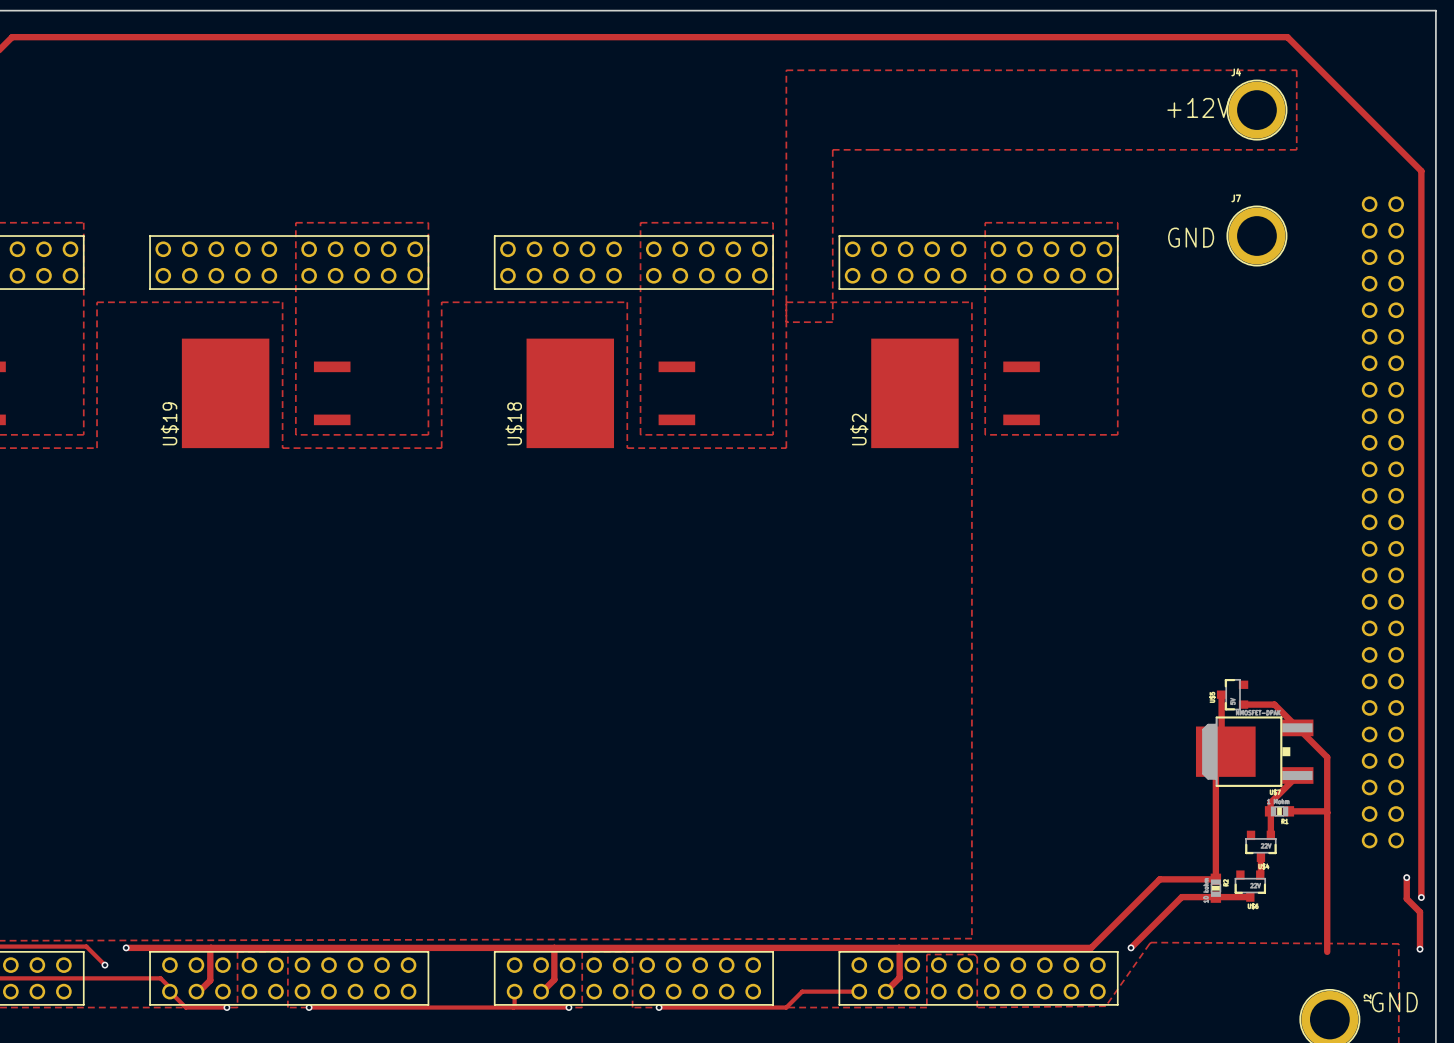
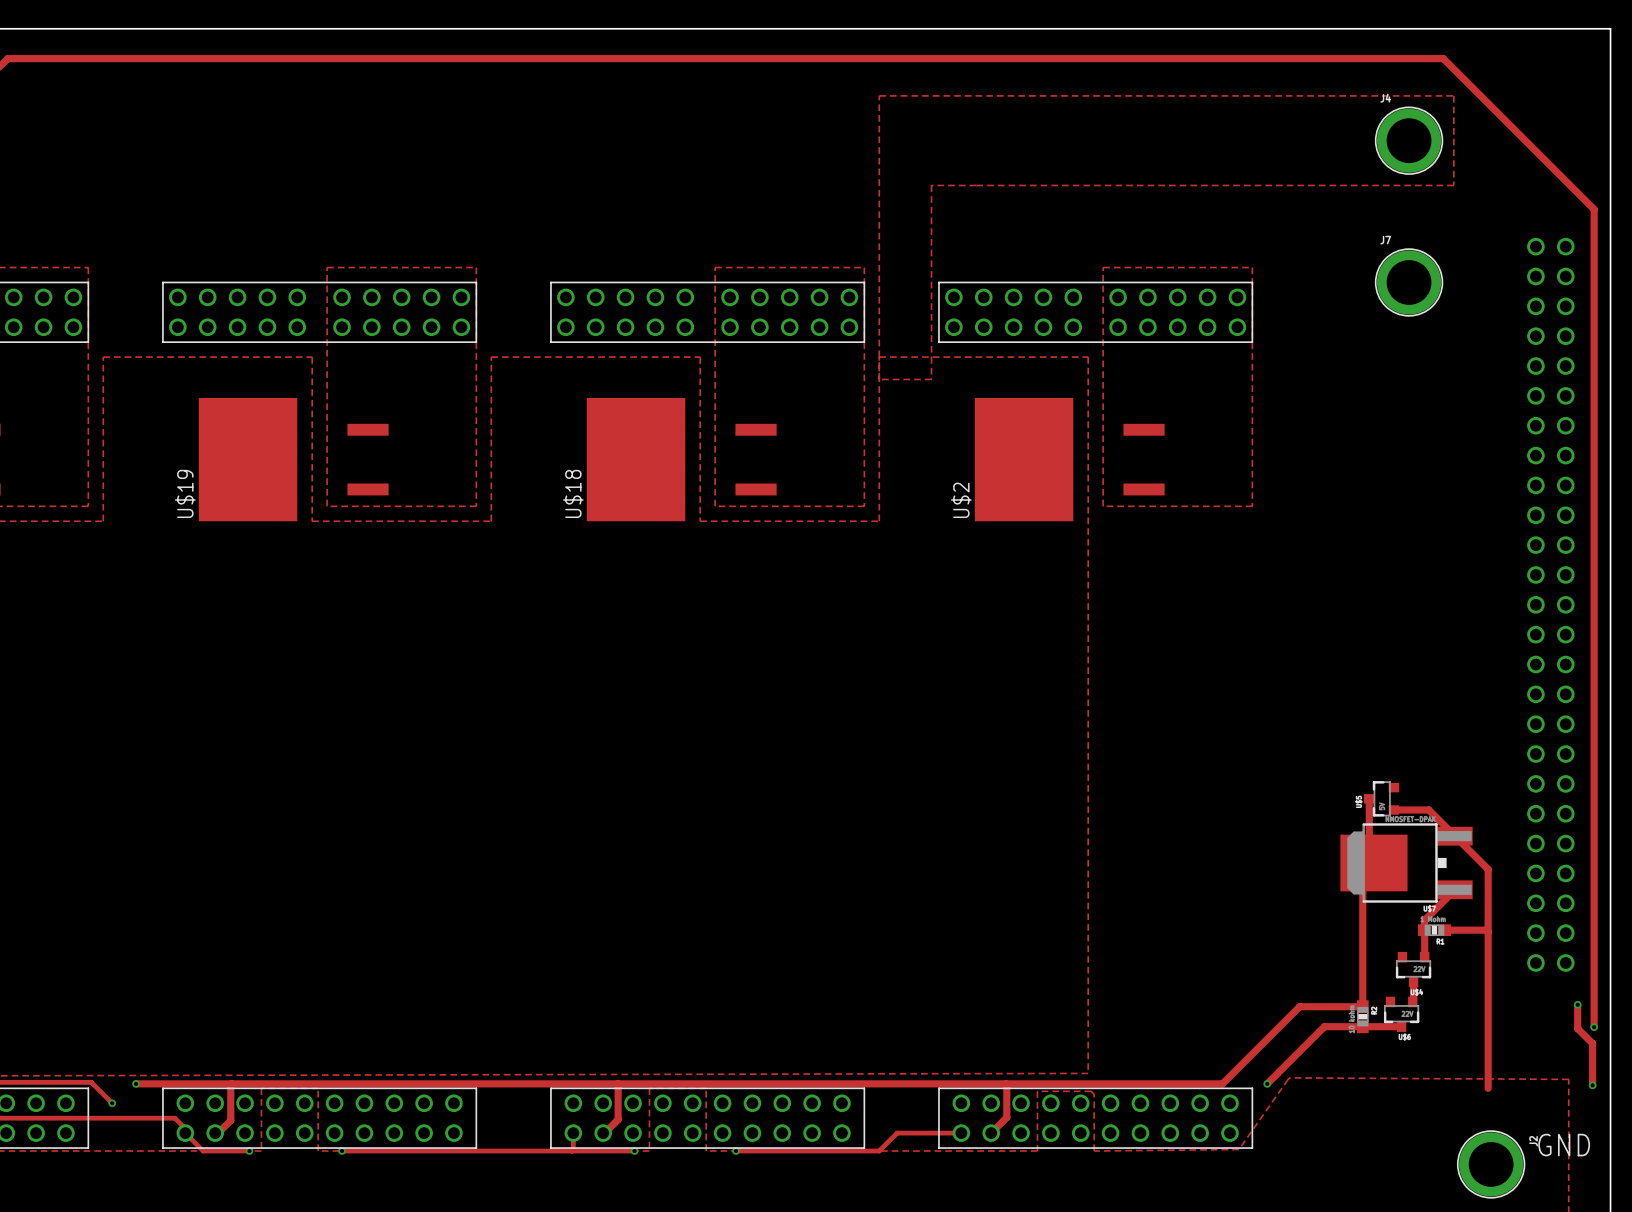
text: +12V (1198, 107) -> none
text: GND (1191, 237) -> none

